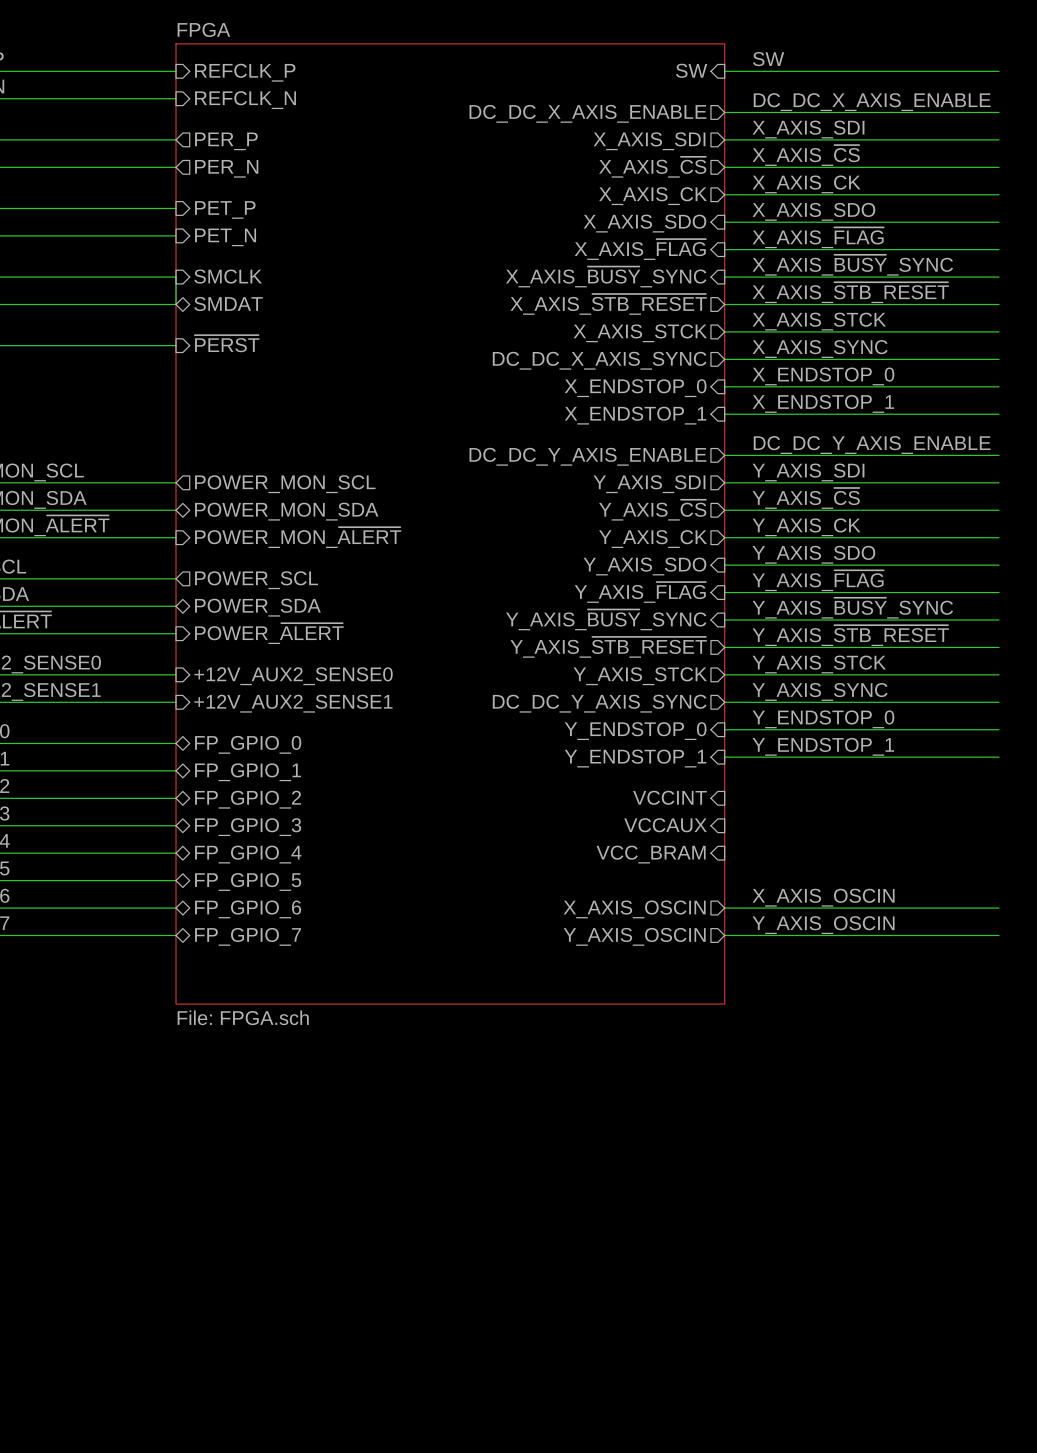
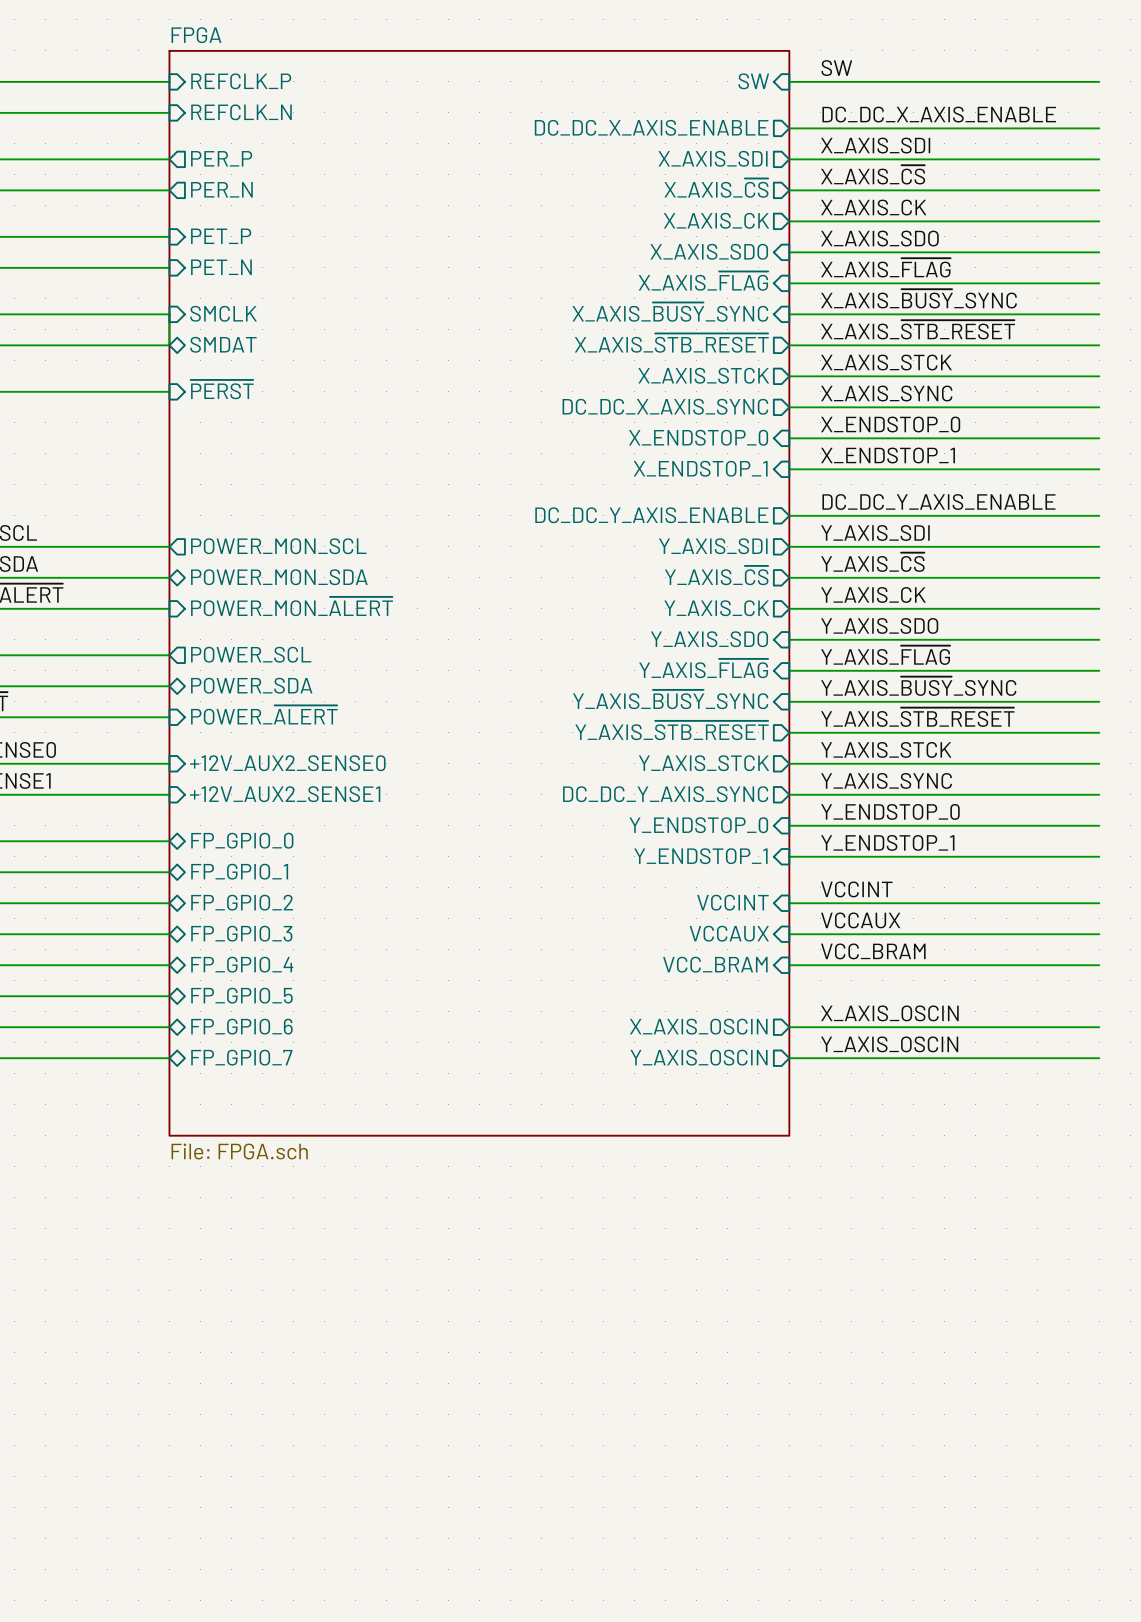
label: none -> VCCINT (856, 889)
wire: none -> (789, 903) (1099, 903)
label: none -> VCCAUX (860, 920)
wire: none -> (789, 934) (1099, 934)
label: none -> VCC_BRAM (873, 951)
wire: none -> (789, 965) (1099, 965)

